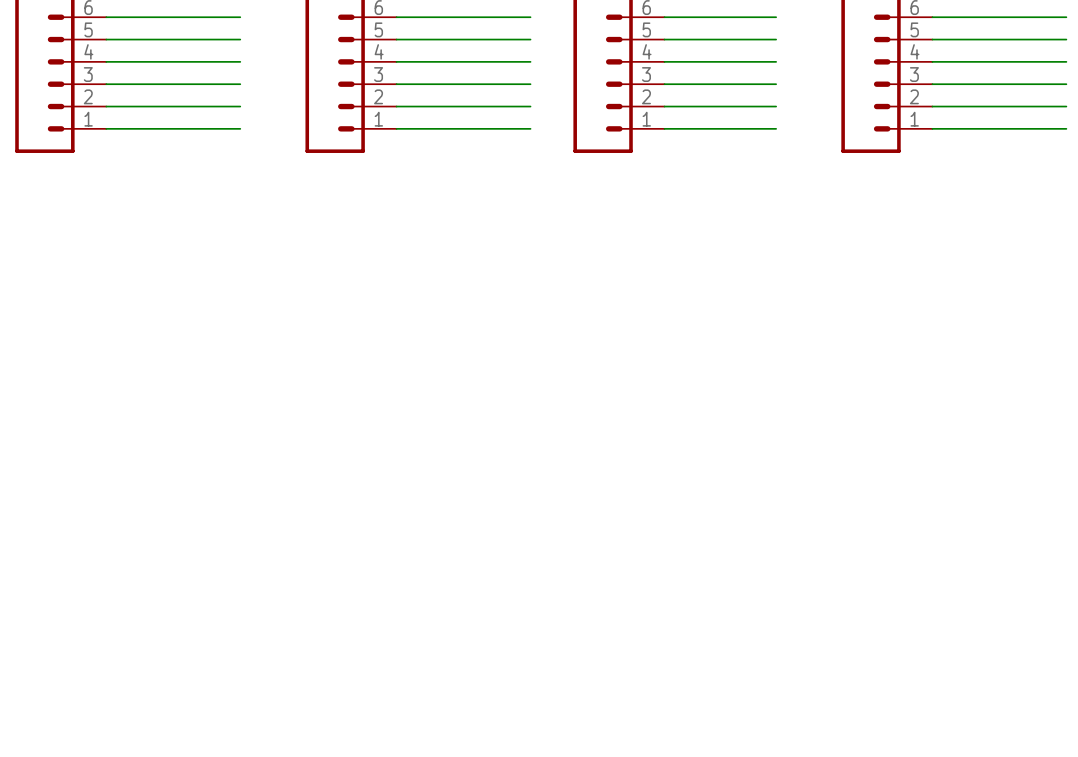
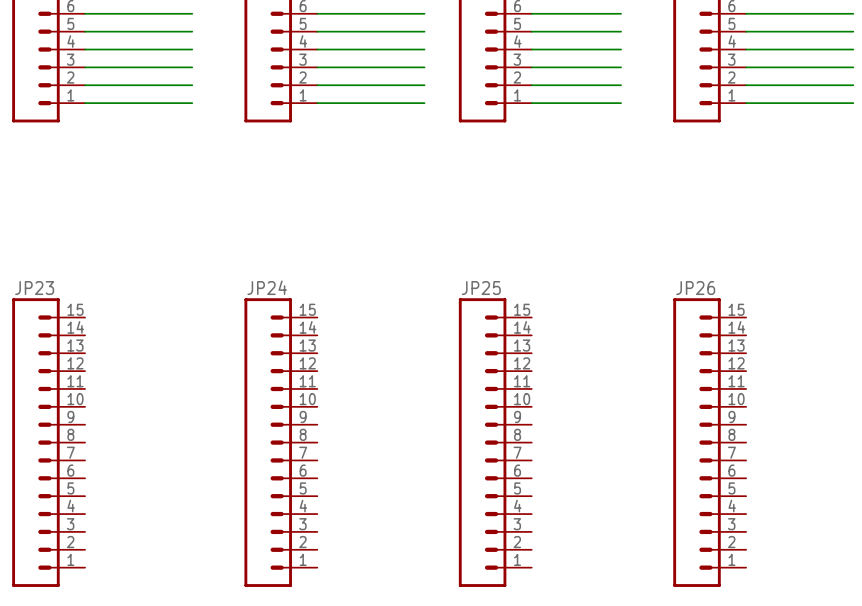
JP23: none -> (48, 442)
JP24: none -> (280, 442)
JP25: none -> (495, 442)
JP26: none -> (709, 442)

